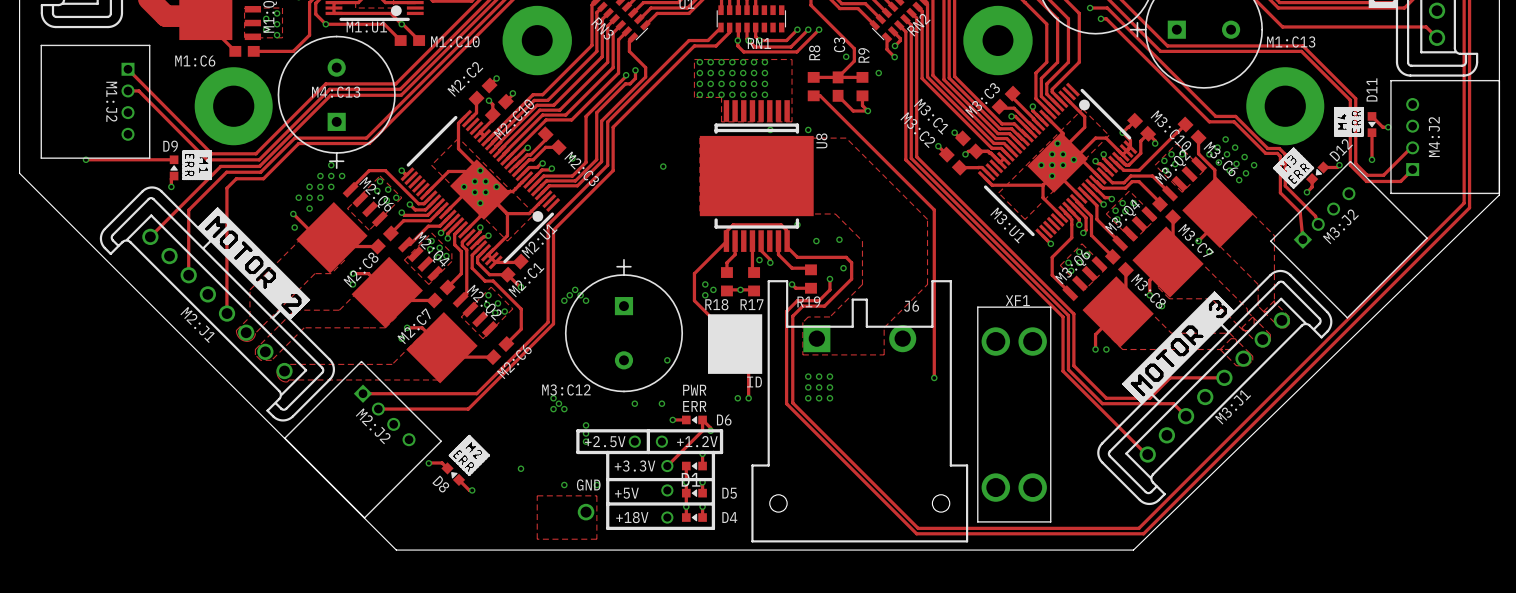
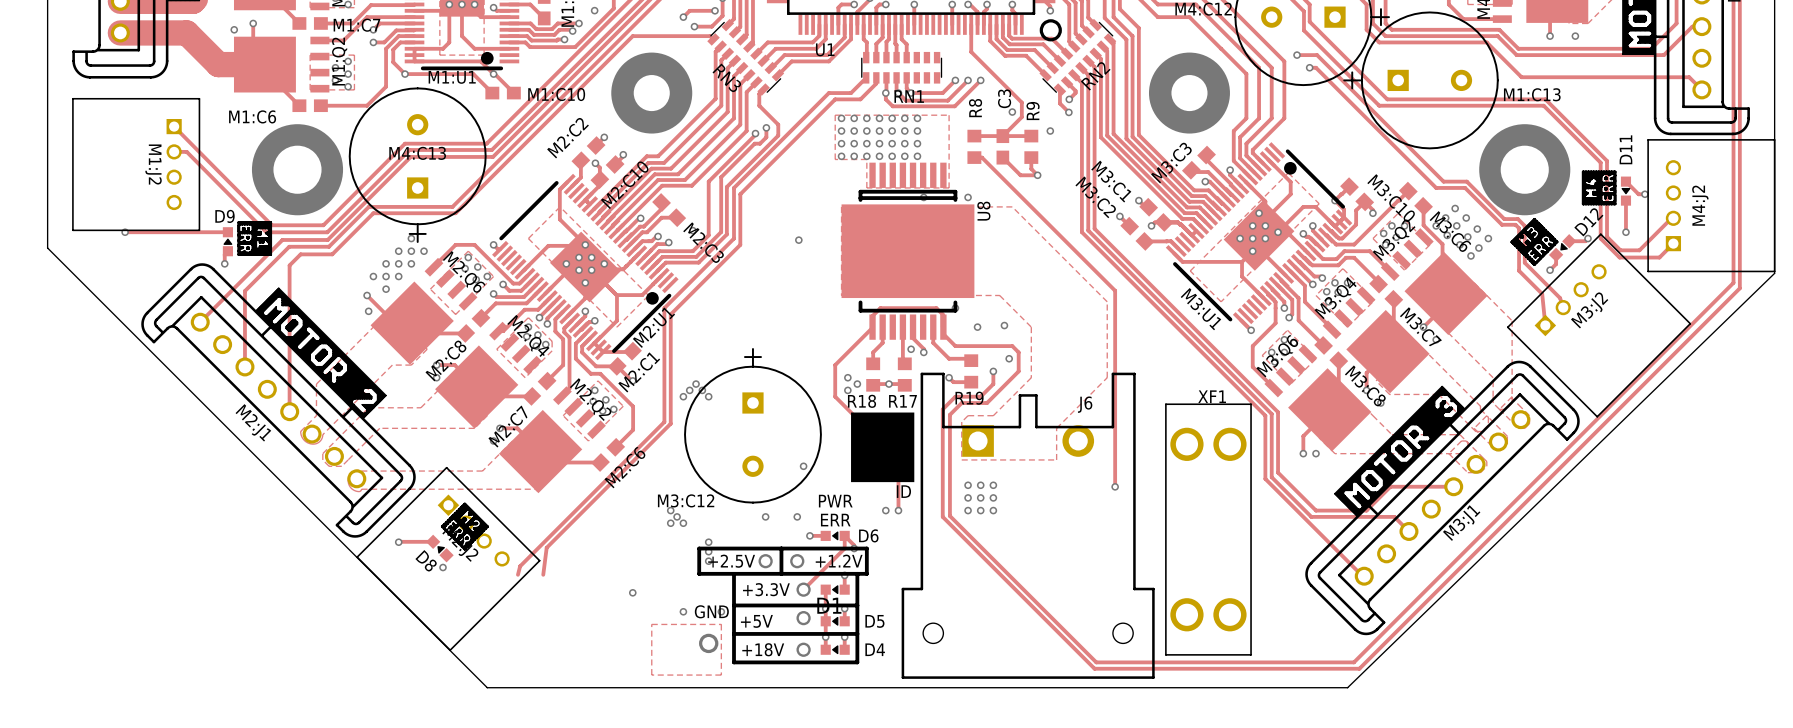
track: (363, 393) (476, 393) -> (517, 574) (520, 566) (581, 505)
track: (378, 409) (468, 409) -> (543, 574) (546, 547) (571, 523)
via: none -> (398, 542)
track: none -> (433, 541) (398, 542)
via: none -> (443, 567)
drawing position: (469, 455) -> (464, 526)
track: (428, 463) (442, 463) (447, 468) -> none
via: (428, 463) -> none
D8 position: (453, 474) -> (439, 548)
track: (458, 479) (469, 490) (472, 490) -> none
via: (472, 490) -> none

